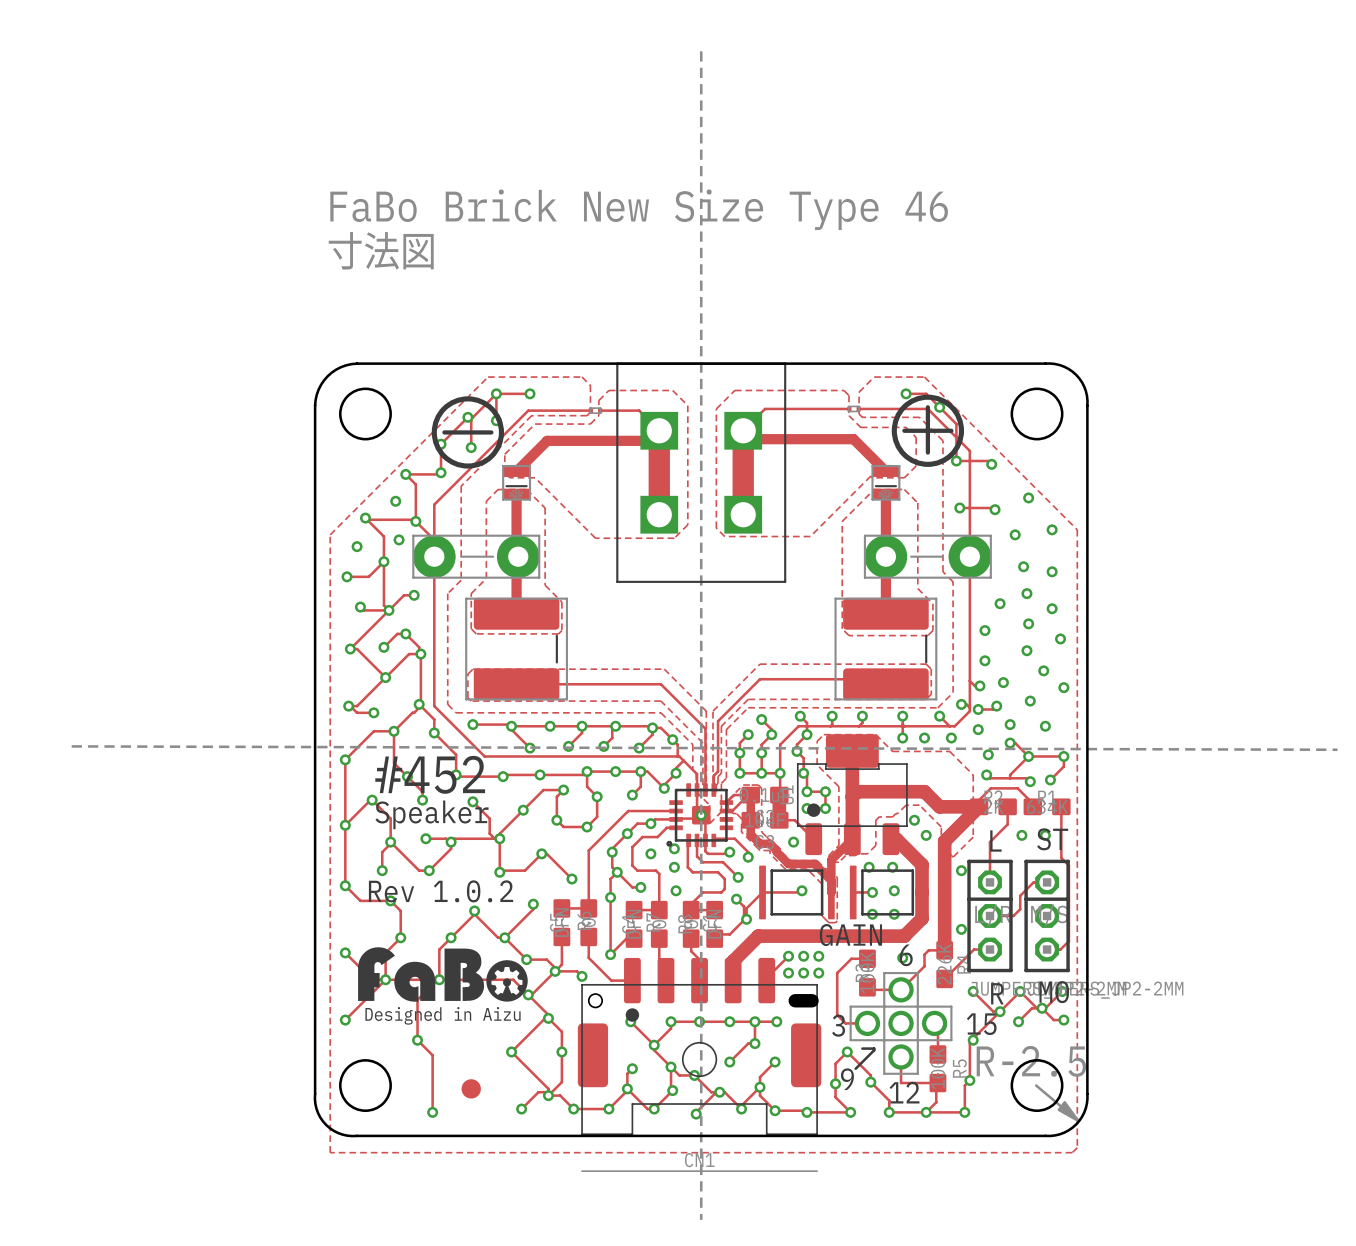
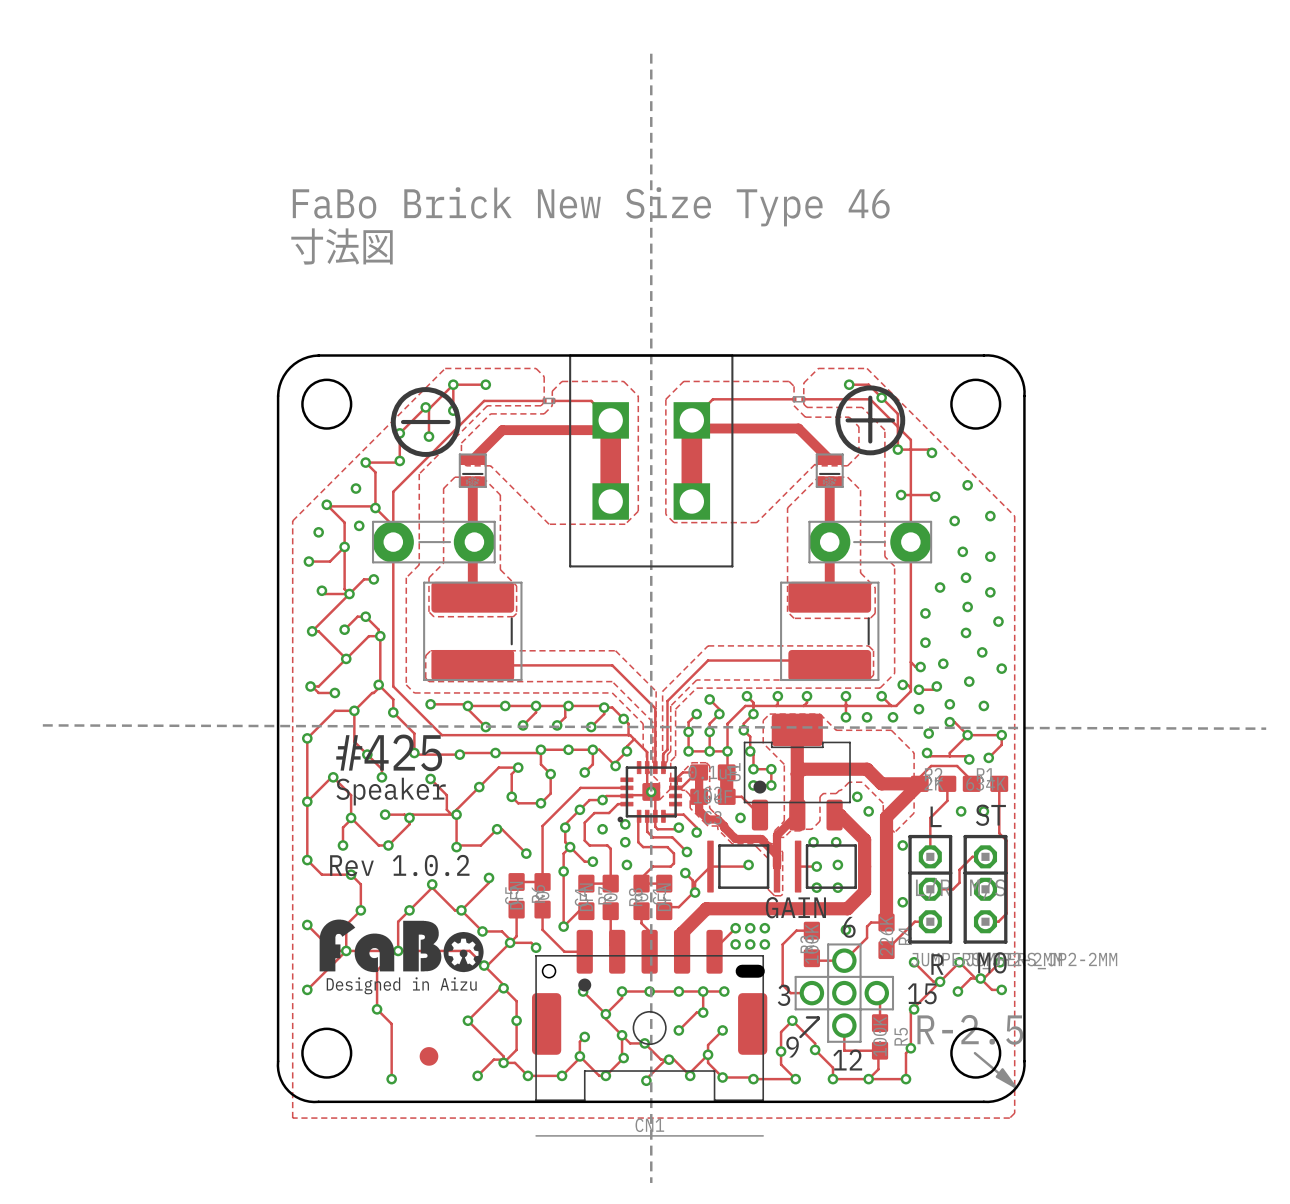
text: #452 (430, 774) -> #425 (389, 752)

